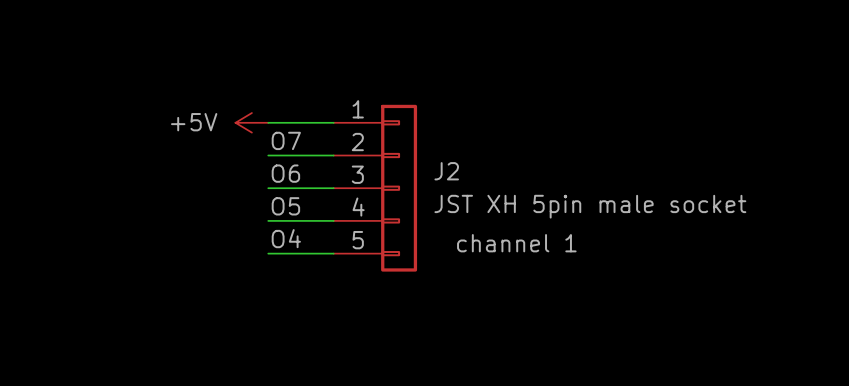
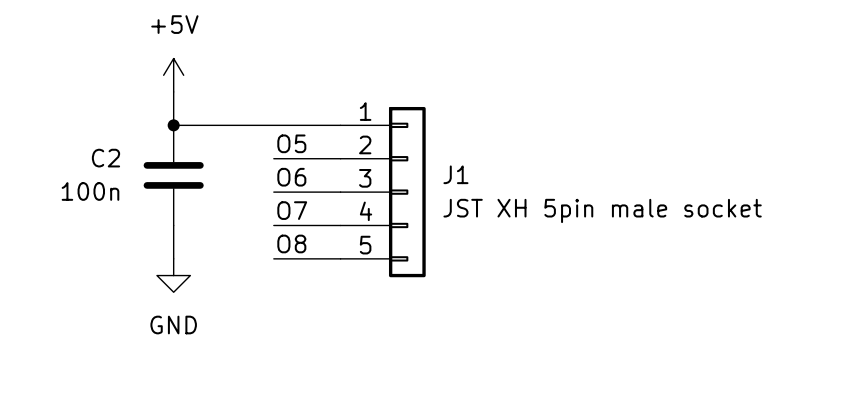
wire: none -> (173, 91) (173, 125) (273, 125)
junction: none -> (173, 125)
power symbol rotation: 0° (251, 122) -> 90° clockwise (173, 75)
power symbol position: +5V (251, 122) -> +5V (173, 75)
label: O7 (286, 140) -> O5 (291, 143)
C2: none -> 100n (173, 175)
J2 name: J2 (446, 171) -> J1 (455, 174)
label: O5 (285, 206) -> O7 (292, 210)
wire: none -> (173, 225) (173, 258)
label: O4 (286, 238) -> O8 (291, 243)
J2 text: channel 1 (516, 243) -> none
power symbol: none -> GND (173, 275)

